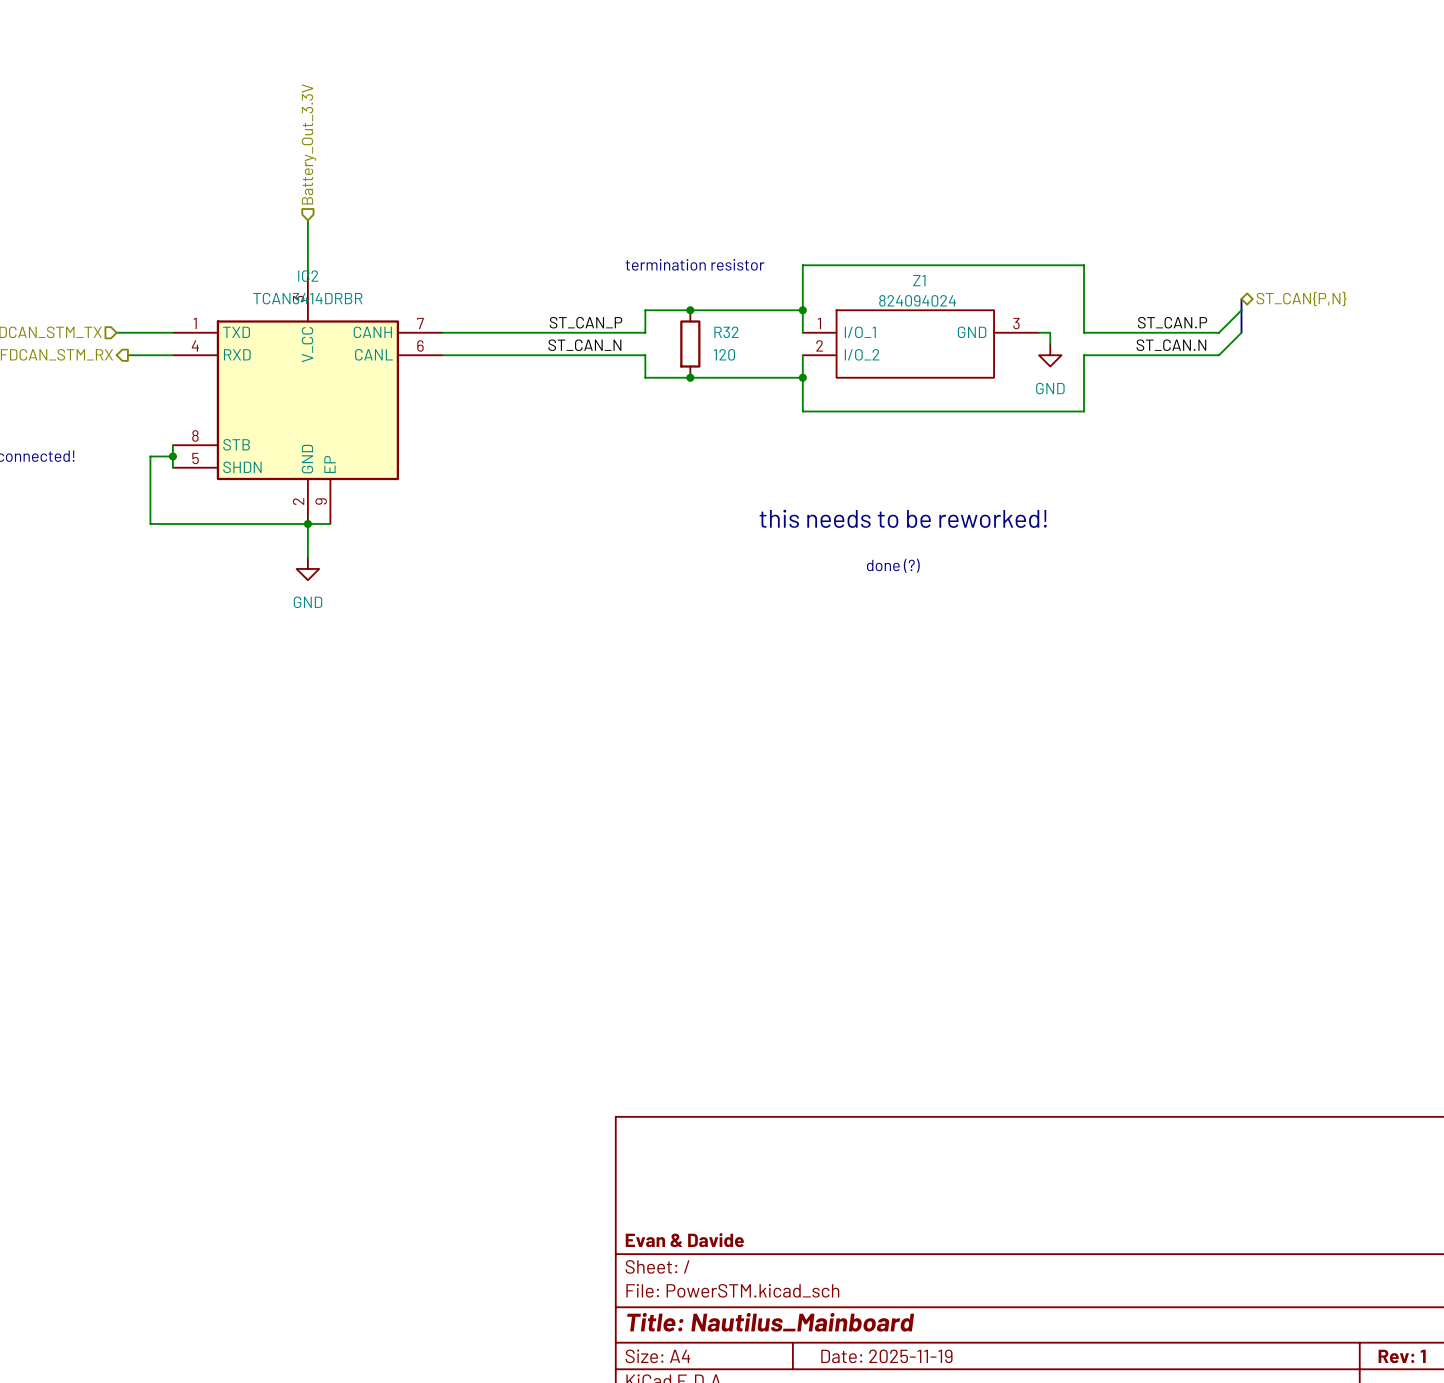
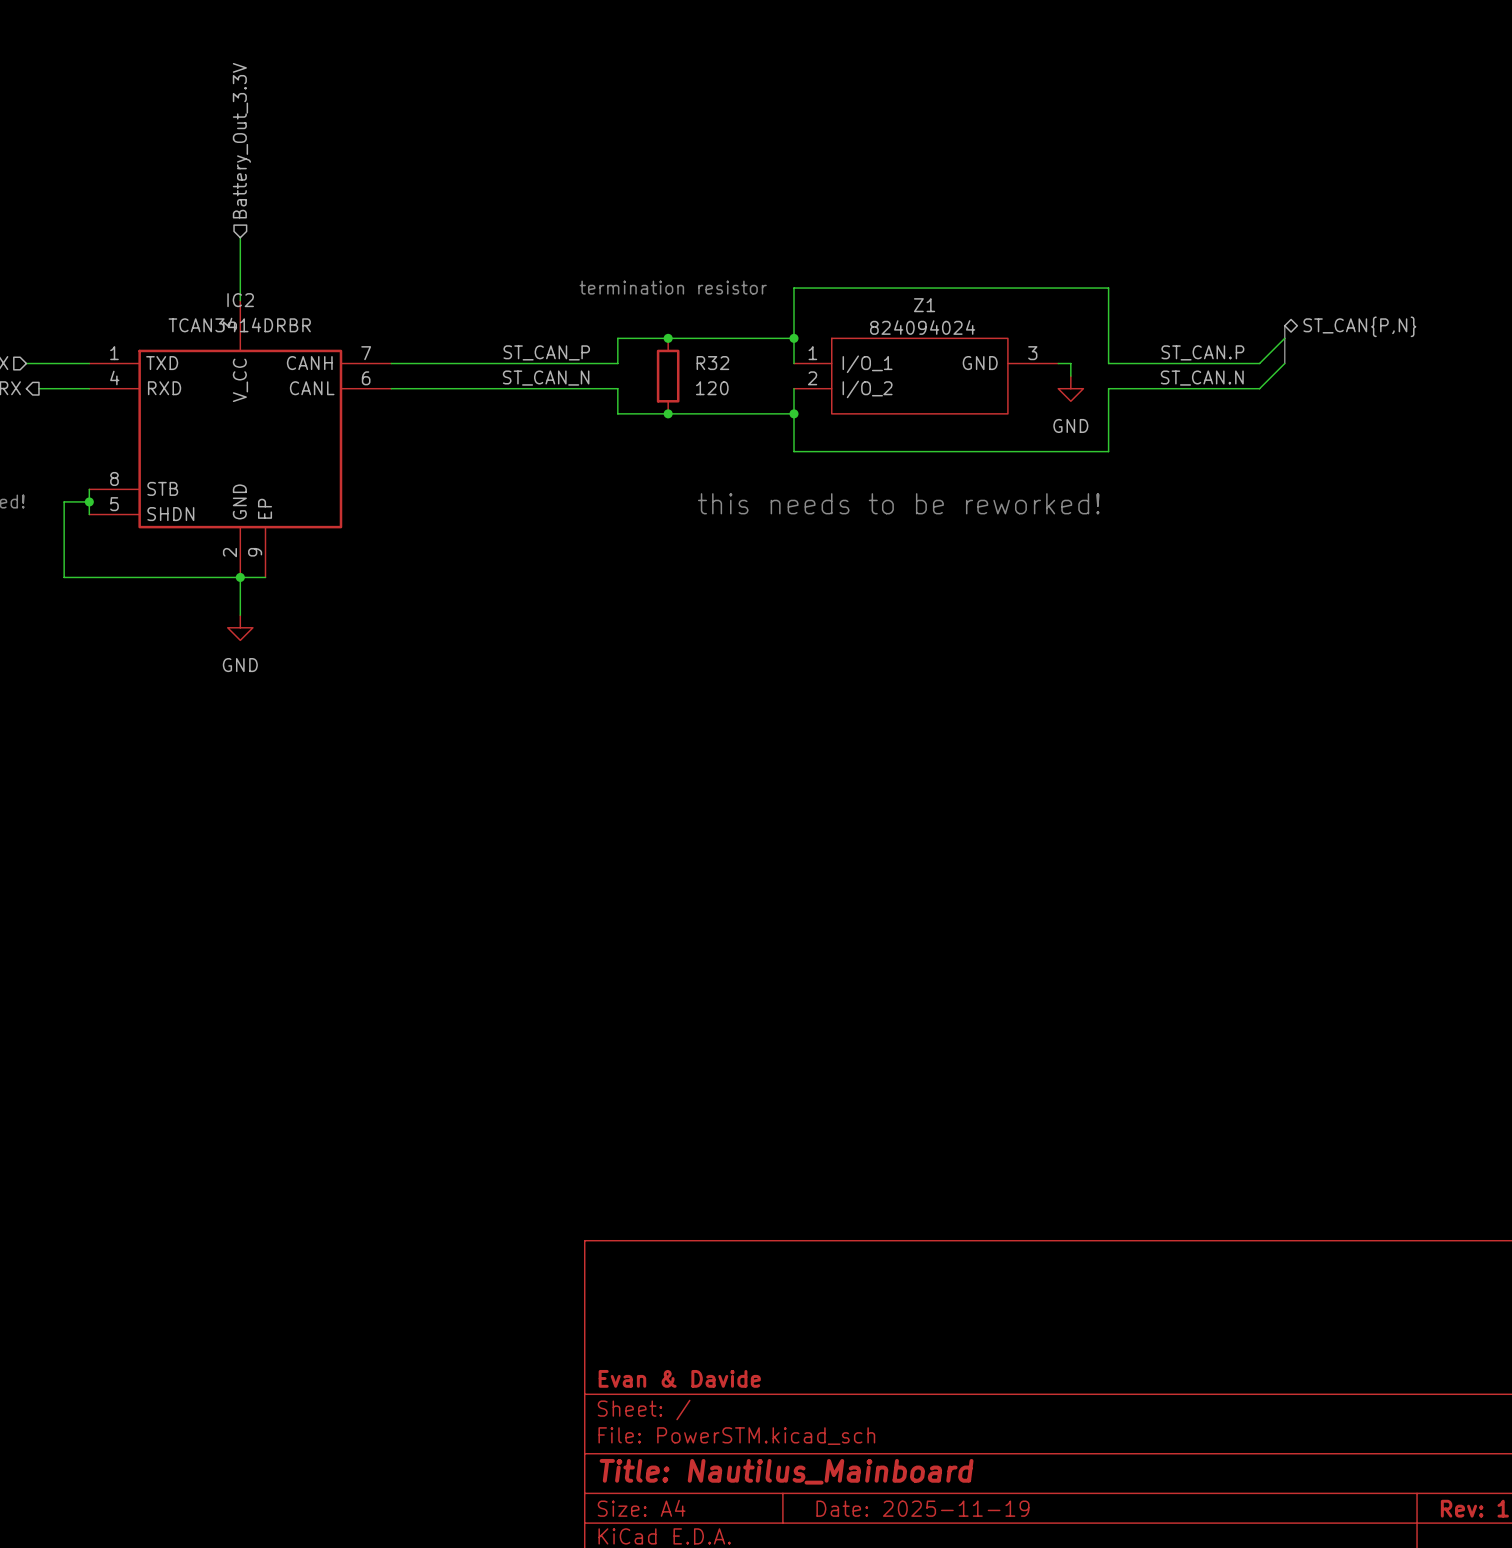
text position: this needs to be reworked! (903, 518) -> this needs to be reworked! (898, 503)
text: done (?) (893, 565) -> none

